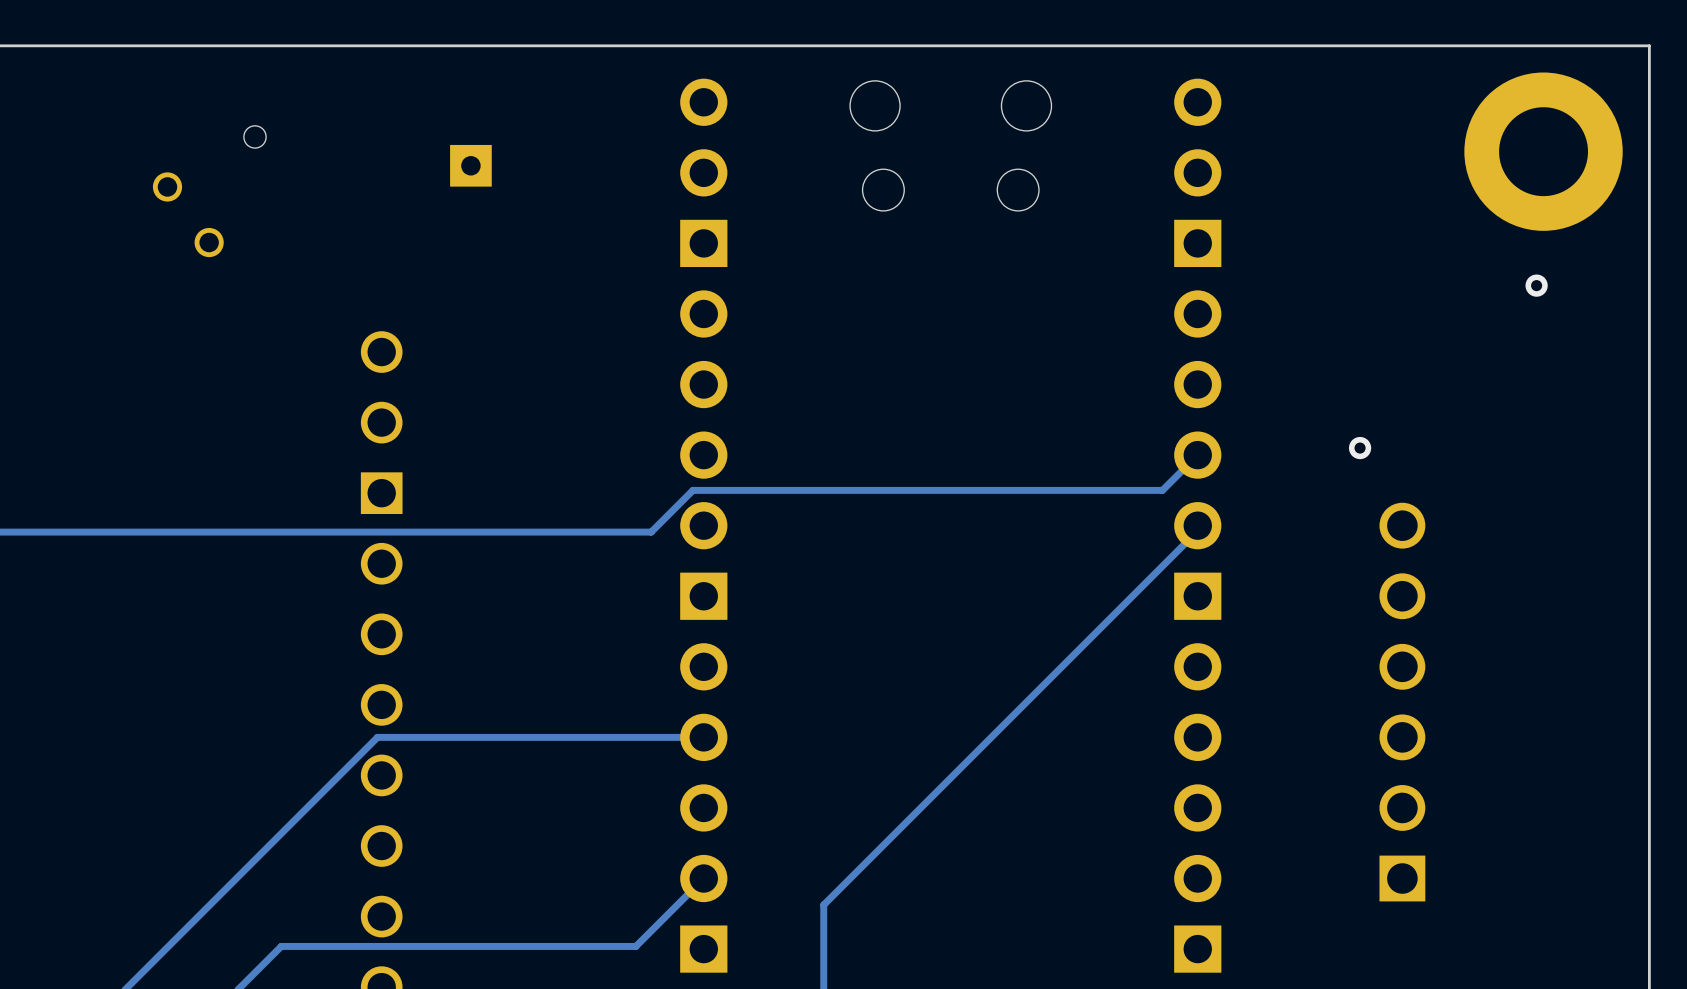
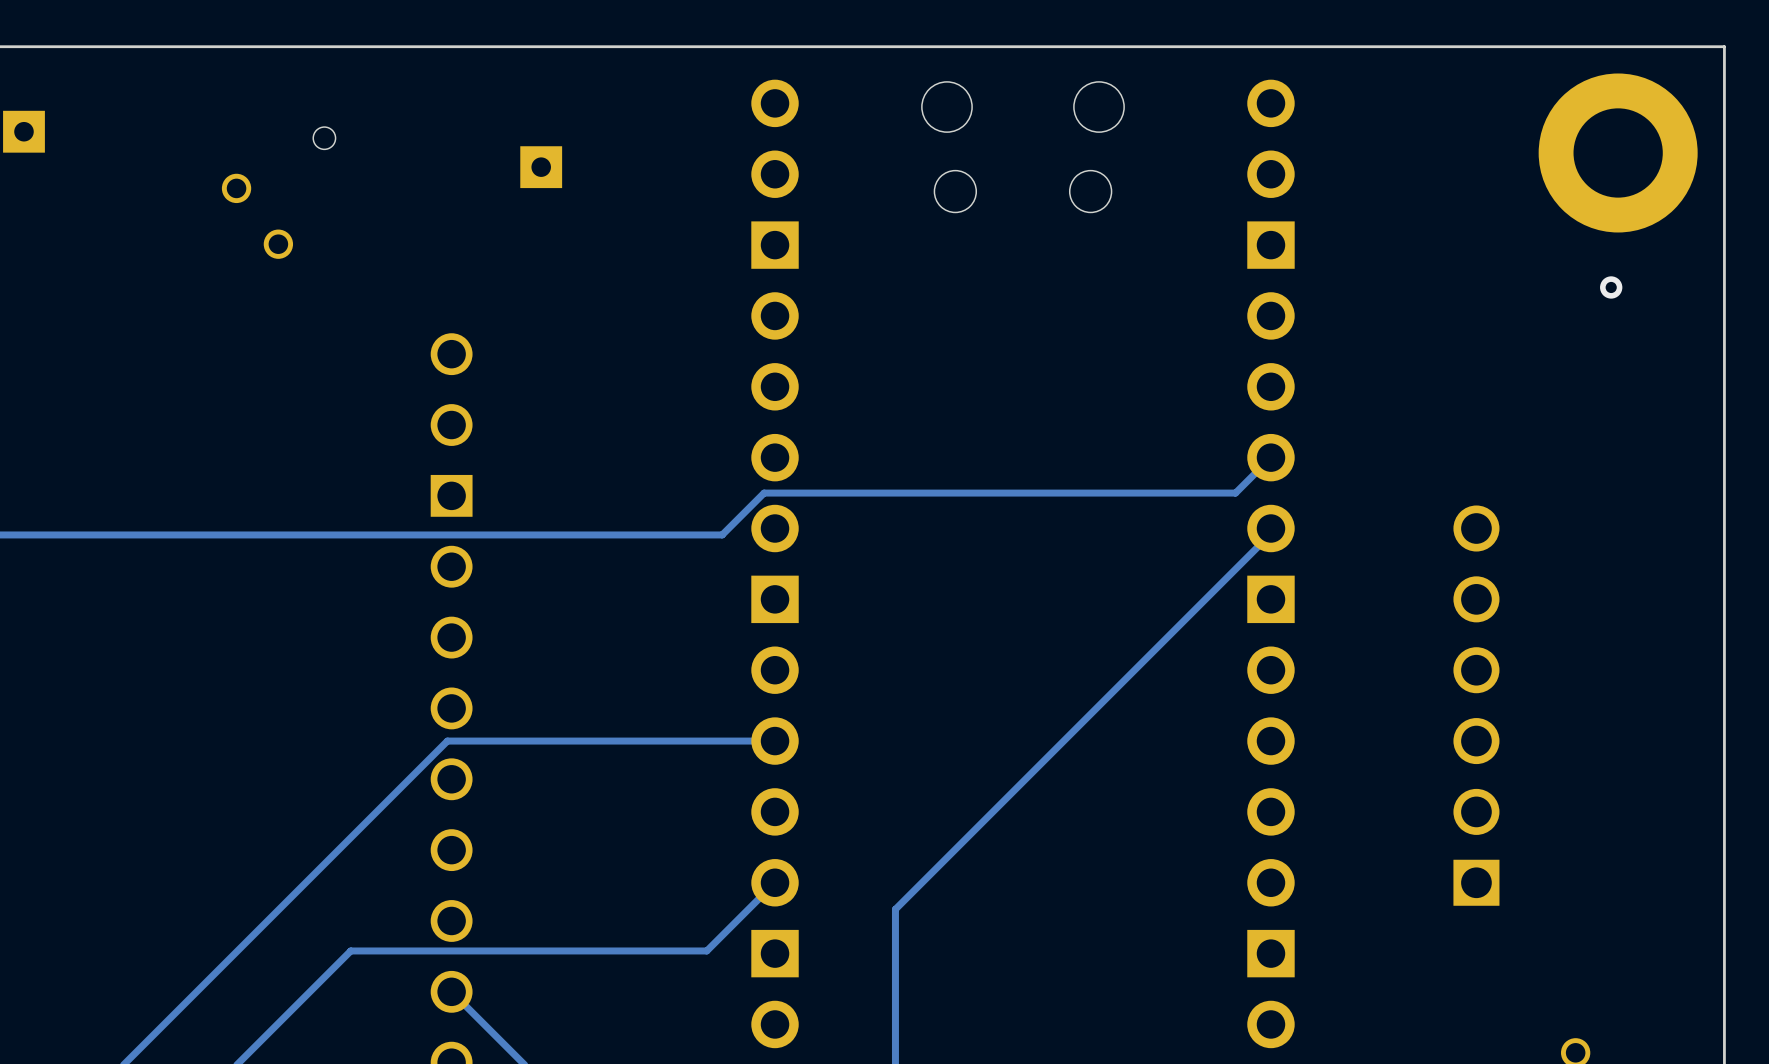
via: (1360, 448) -> none

